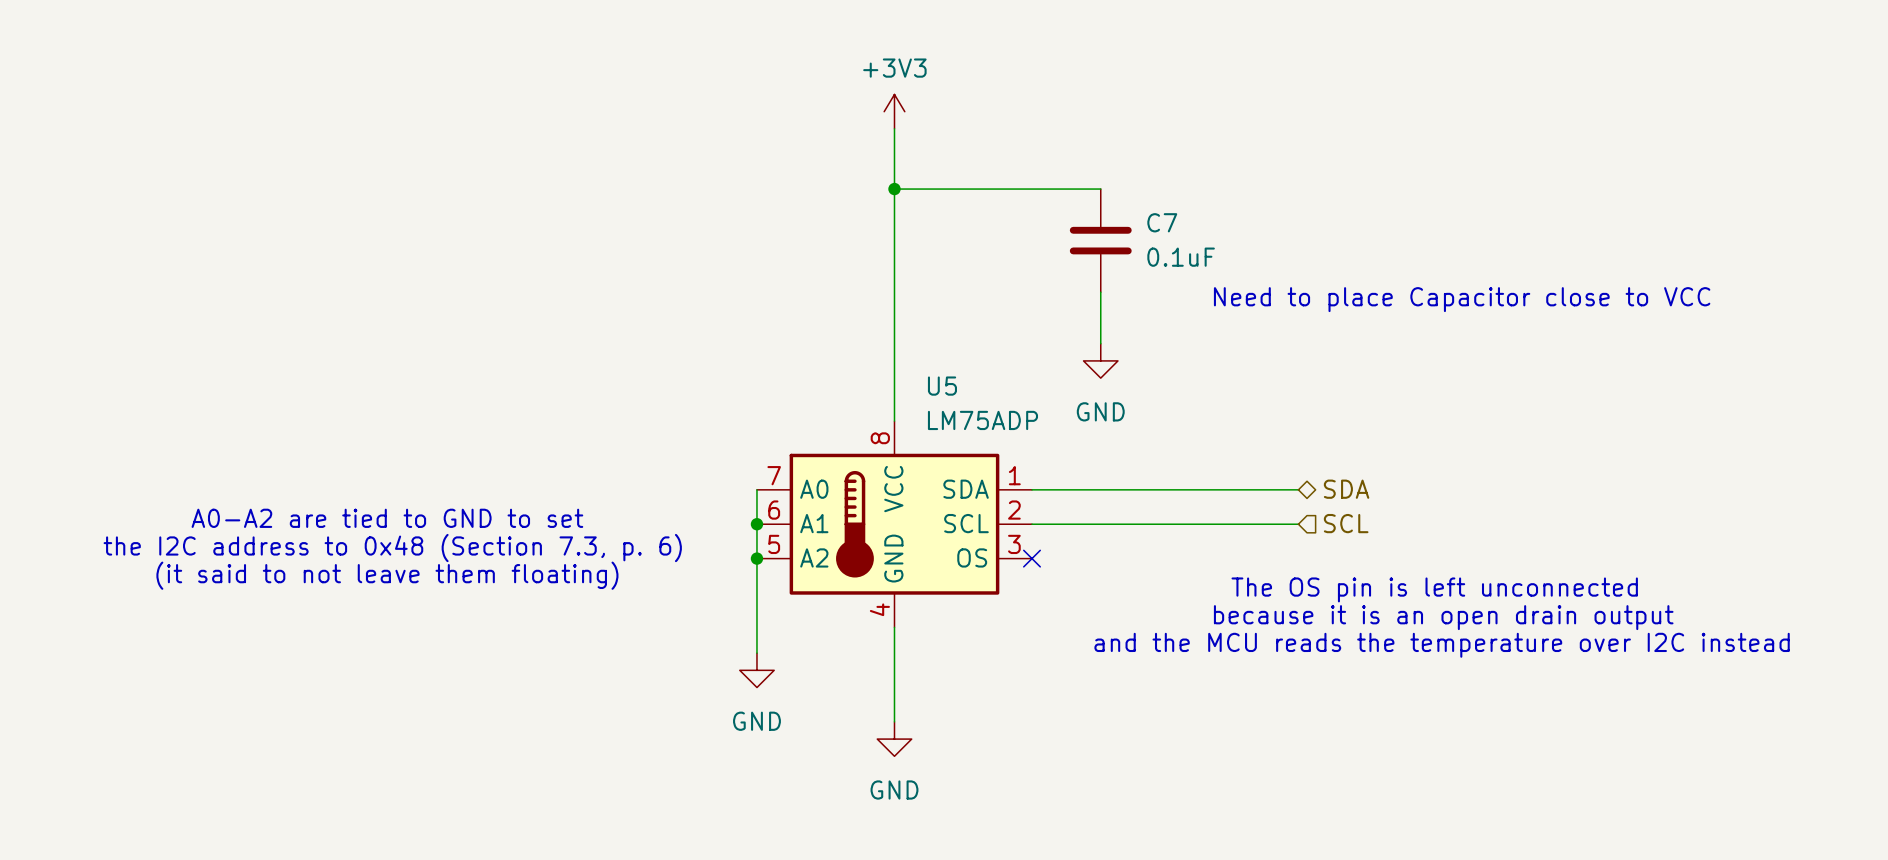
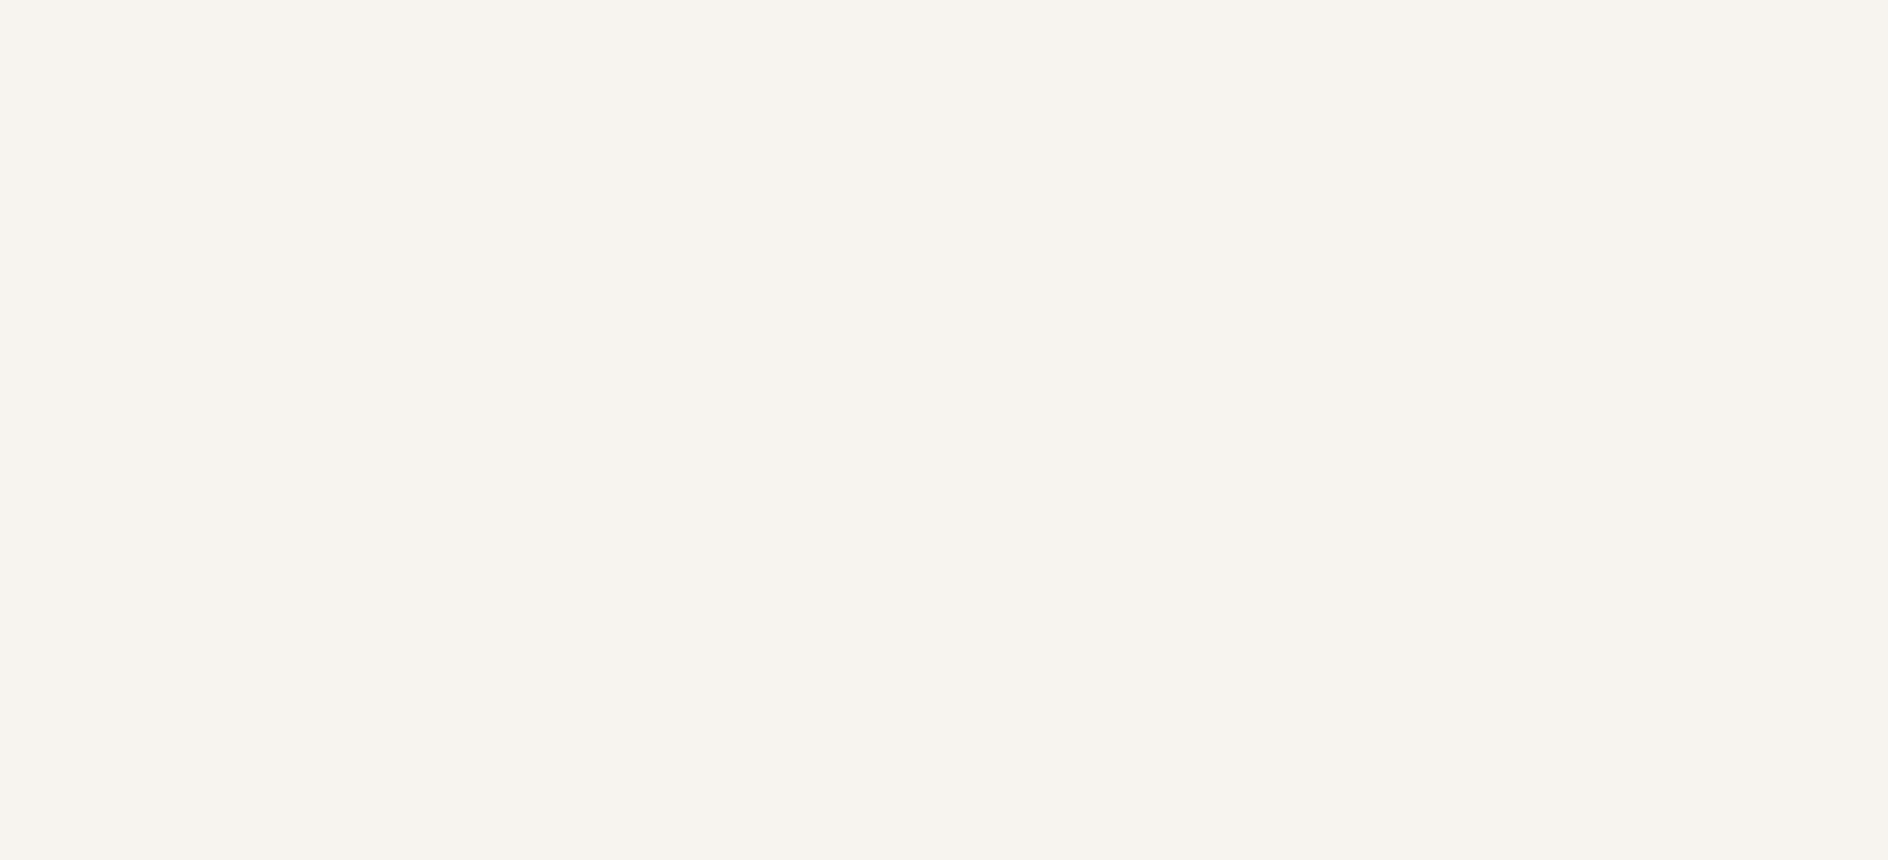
power symbol: +3V3 (894, 111) -> none
wire: (894, 128) (894, 421) -> none
wire: (894, 189) (1100, 189) -> none
junction: (894, 189) -> none
C7: 0.1uF (1100, 240) -> none
wire: (1100, 292) (1100, 343) -> none
text: Need to place Capacitor close to VCC (1462, 299) -> none
power symbol: GND (1100, 360) -> none
wire: (756, 489) (756, 653) -> none
wire: (1032, 489) (1298, 489) -> none
hierarchical label: SDA (1346, 489) -> none
text: A0-A2 are tied to GND to set (387, 518) -> none
hierarchical label: SCL (1346, 523) -> none
junction: (756, 524) -> none
U5: LM75ADP (894, 524) -> none
wire: (1032, 524) (1298, 524) -> none
text: the I2C address to 0x48 (Section 7.3, p. 6) (392, 548) -> none
junction: (756, 558) -> none
no-connect mark: (1032, 558) -> none
text: (it said to not leave them floating) (387, 575) -> none
text: The OS pin is left unconnected (1434, 589) -> none
text: because it is an open drain output (1443, 617) -> none
wire: (894, 627) (894, 721) -> none
text: and the MCU reads the temperature over I2C instead (1442, 645) -> none
power symbol: GND (756, 670) -> none
power symbol: GND (894, 739) -> none

